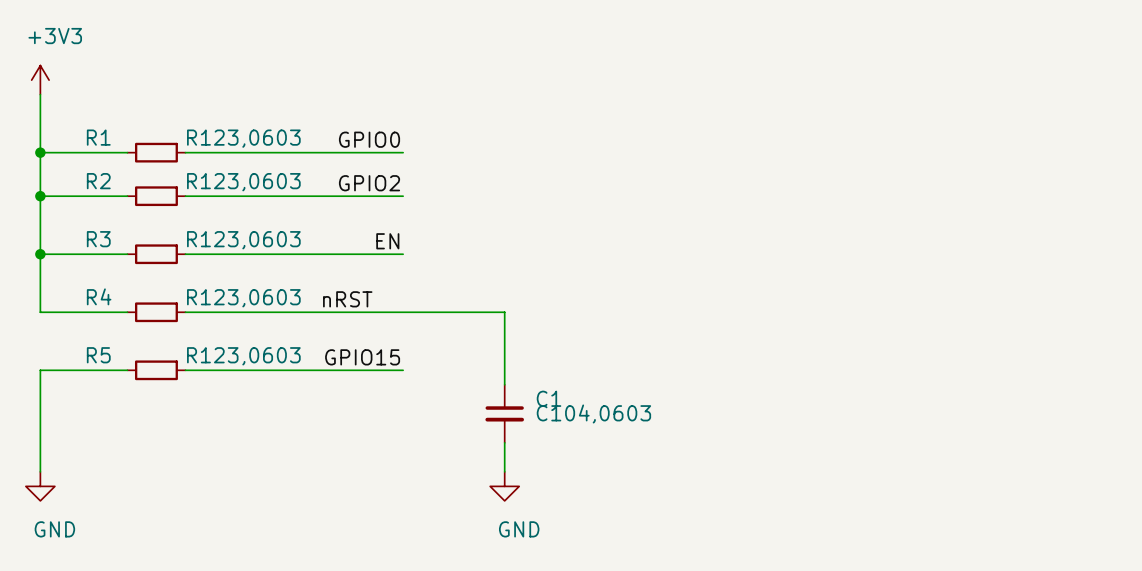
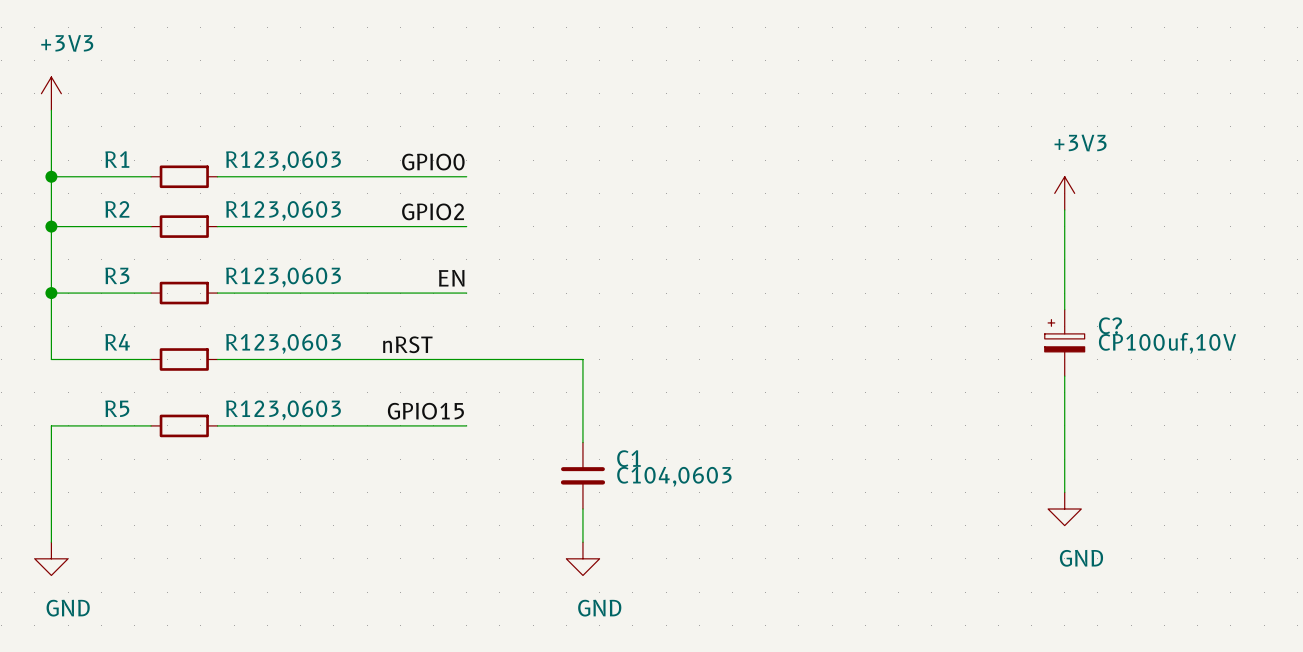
power symbol: none -> +3V3 (1064, 193)
wire: none -> (1064, 209) (1064, 309)
C?: none -> CP100uf,10V (1064, 342)
wire: none -> (1064, 376) (1064, 492)
power symbol: none -> GND (1064, 509)

